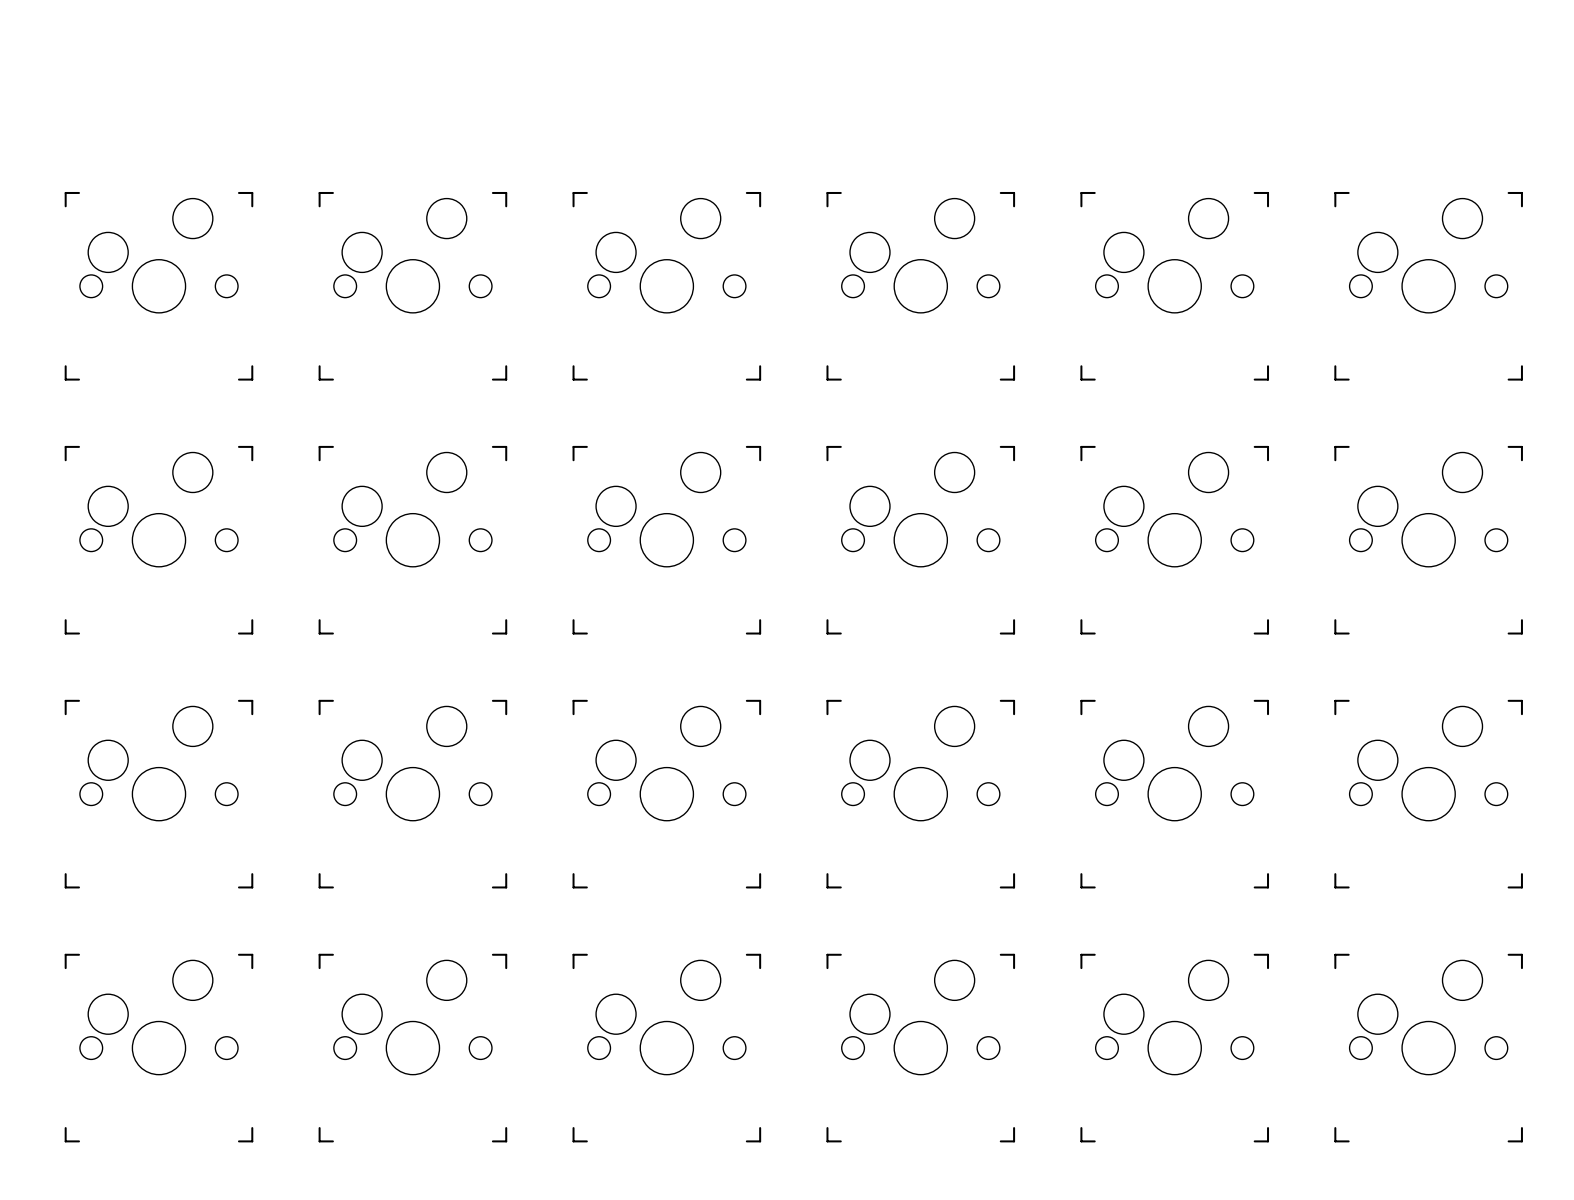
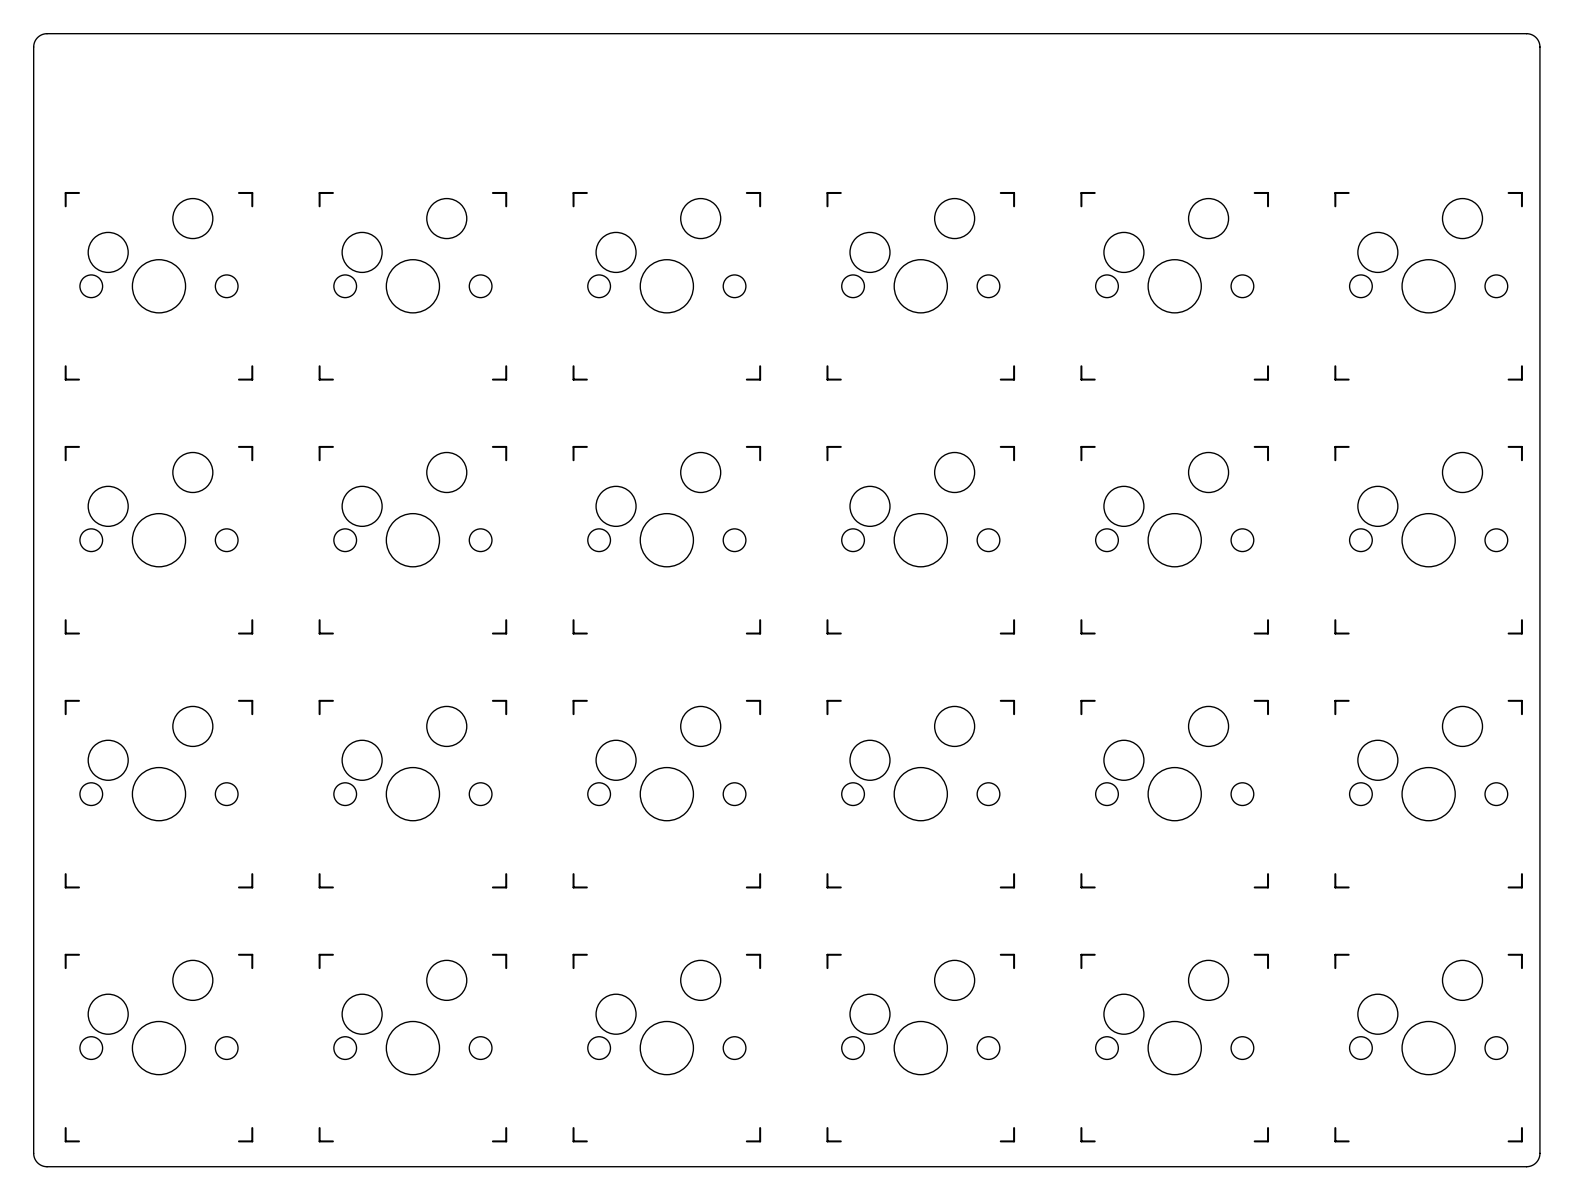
board edge: none -> (47, 33) (1526, 33) (1534, 36) (1539, 47) (1539, 1153) (1537, 1161) (1526, 1166) (47, 1166) (38, 1163) (33, 1153) (33, 47) (37, 37) (47, 33)

